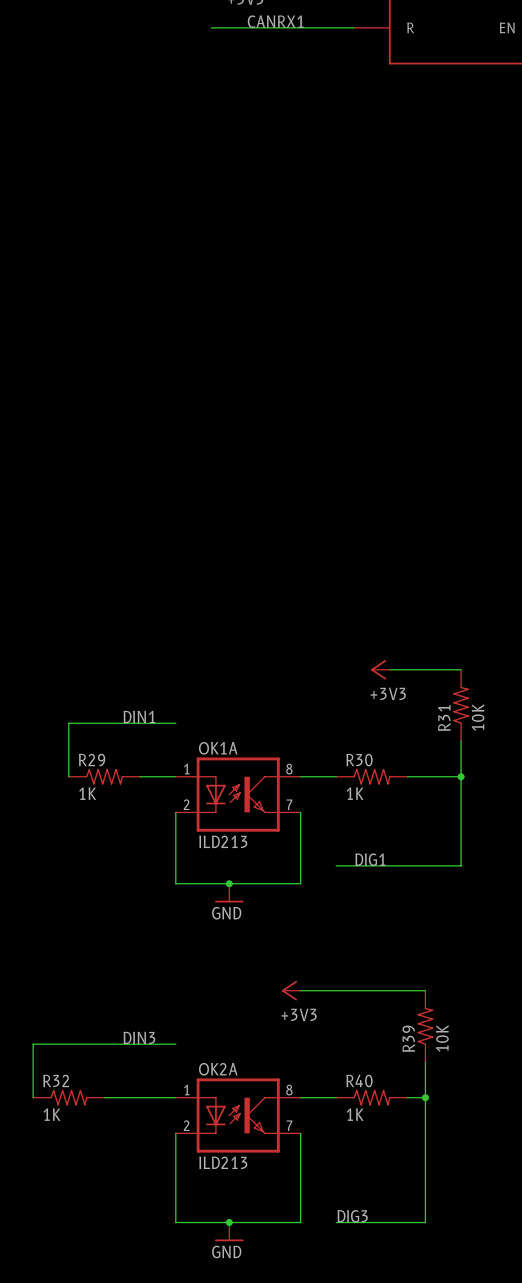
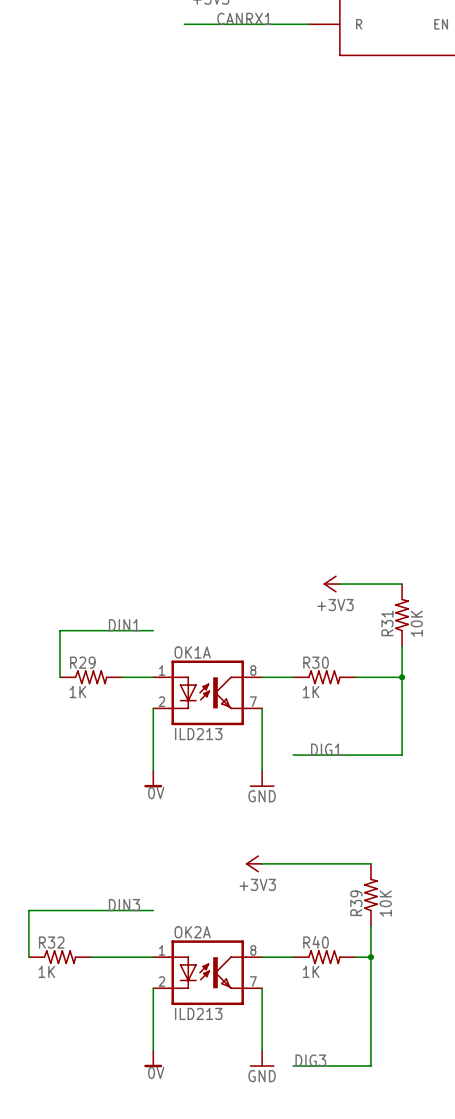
wire: (175, 883) (300, 883) -> none
junction: (229, 883) -> none
power symbol: none -> 0V (153, 778)
power symbol position: GND (229, 893) -> GND (262, 778)
wire: (175, 1204) (175, 1222) (300, 1222) (300, 1204) -> none
power symbol: none -> 0V (153, 1058)
junction: (229, 1222) -> none
power symbol position: GND (229, 1231) -> GND (262, 1058)

